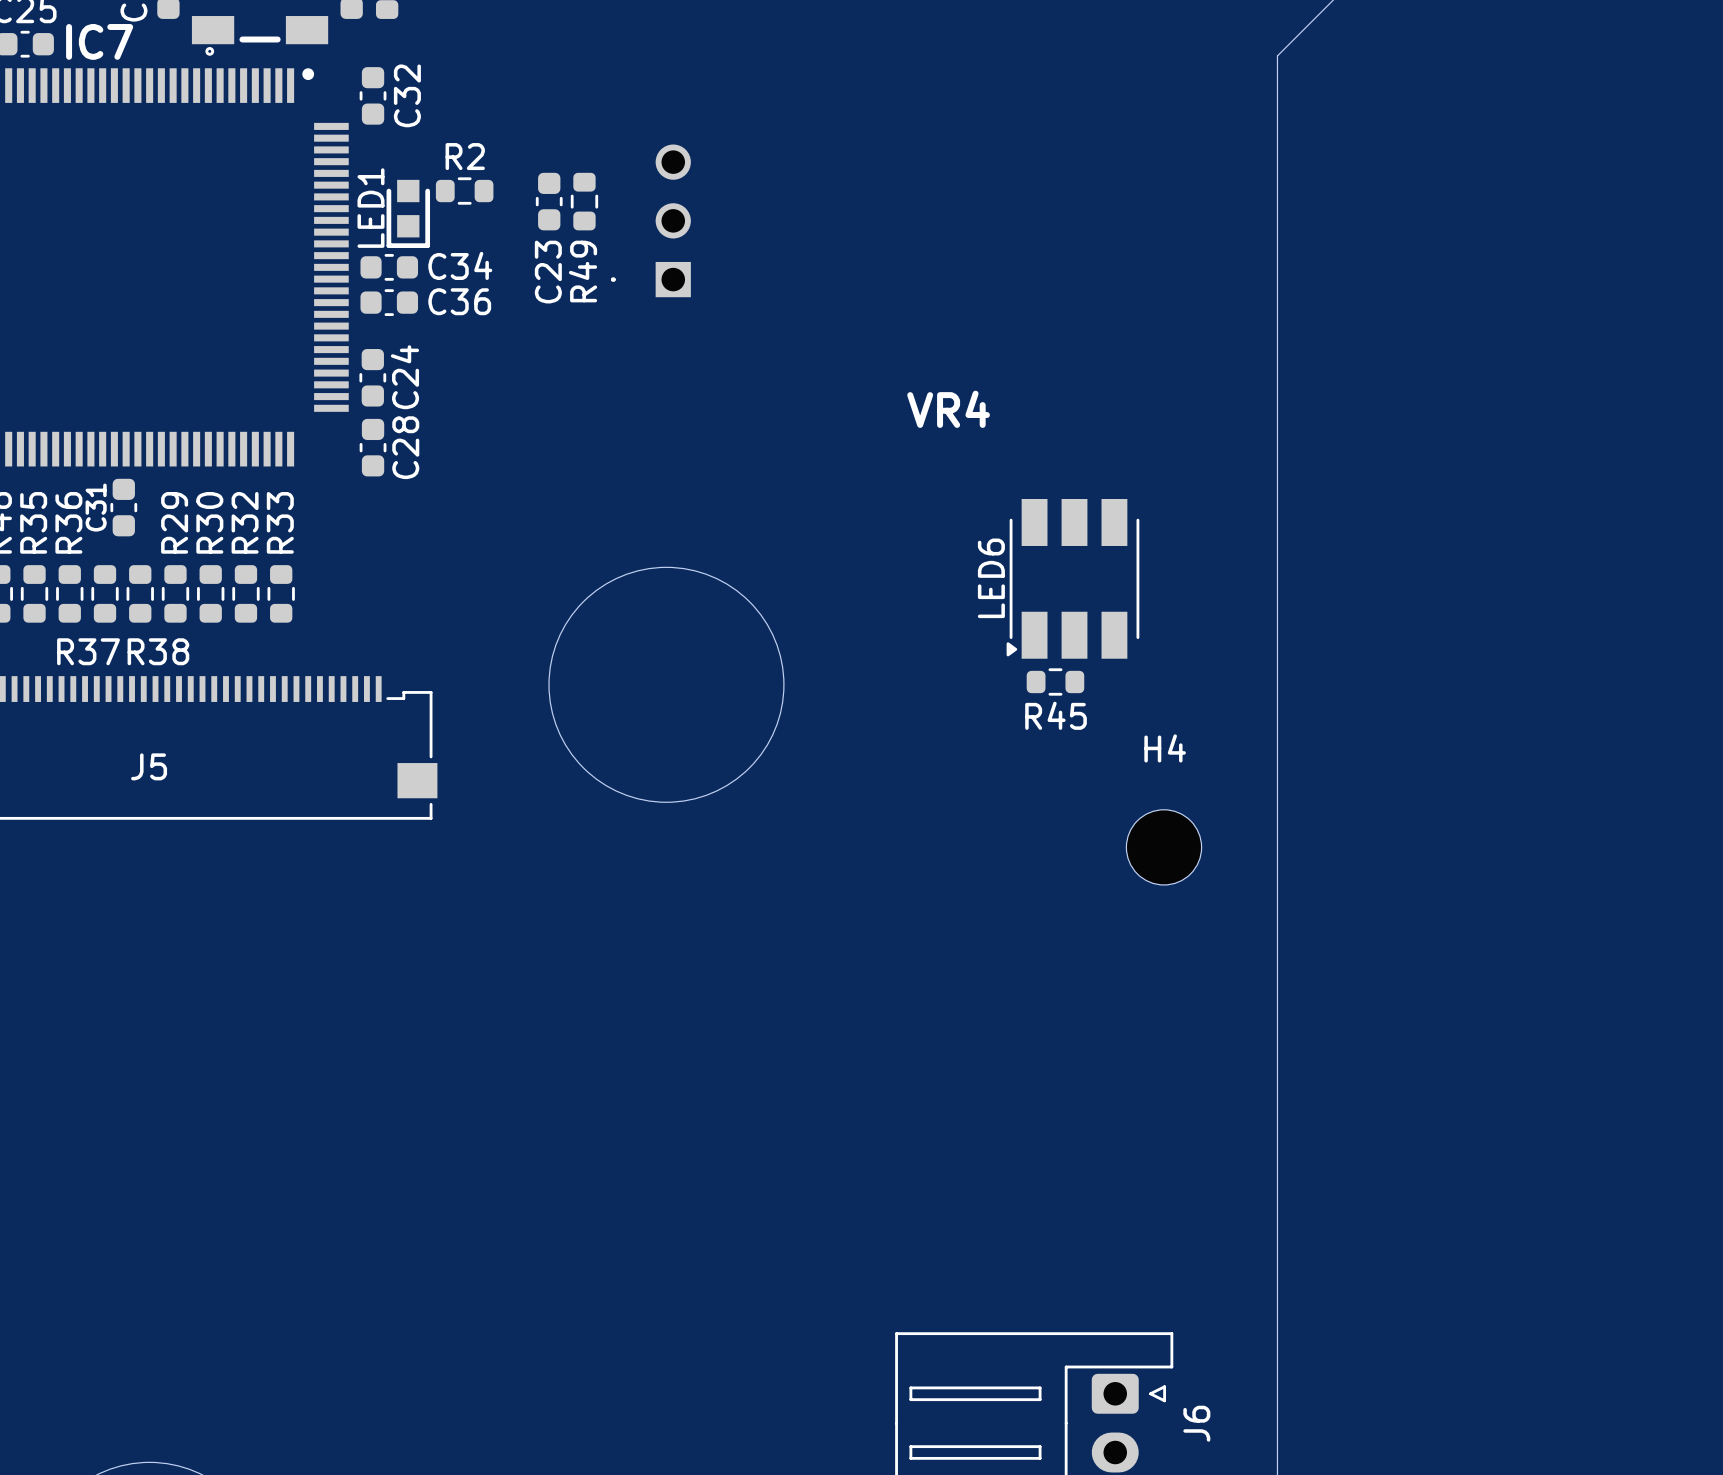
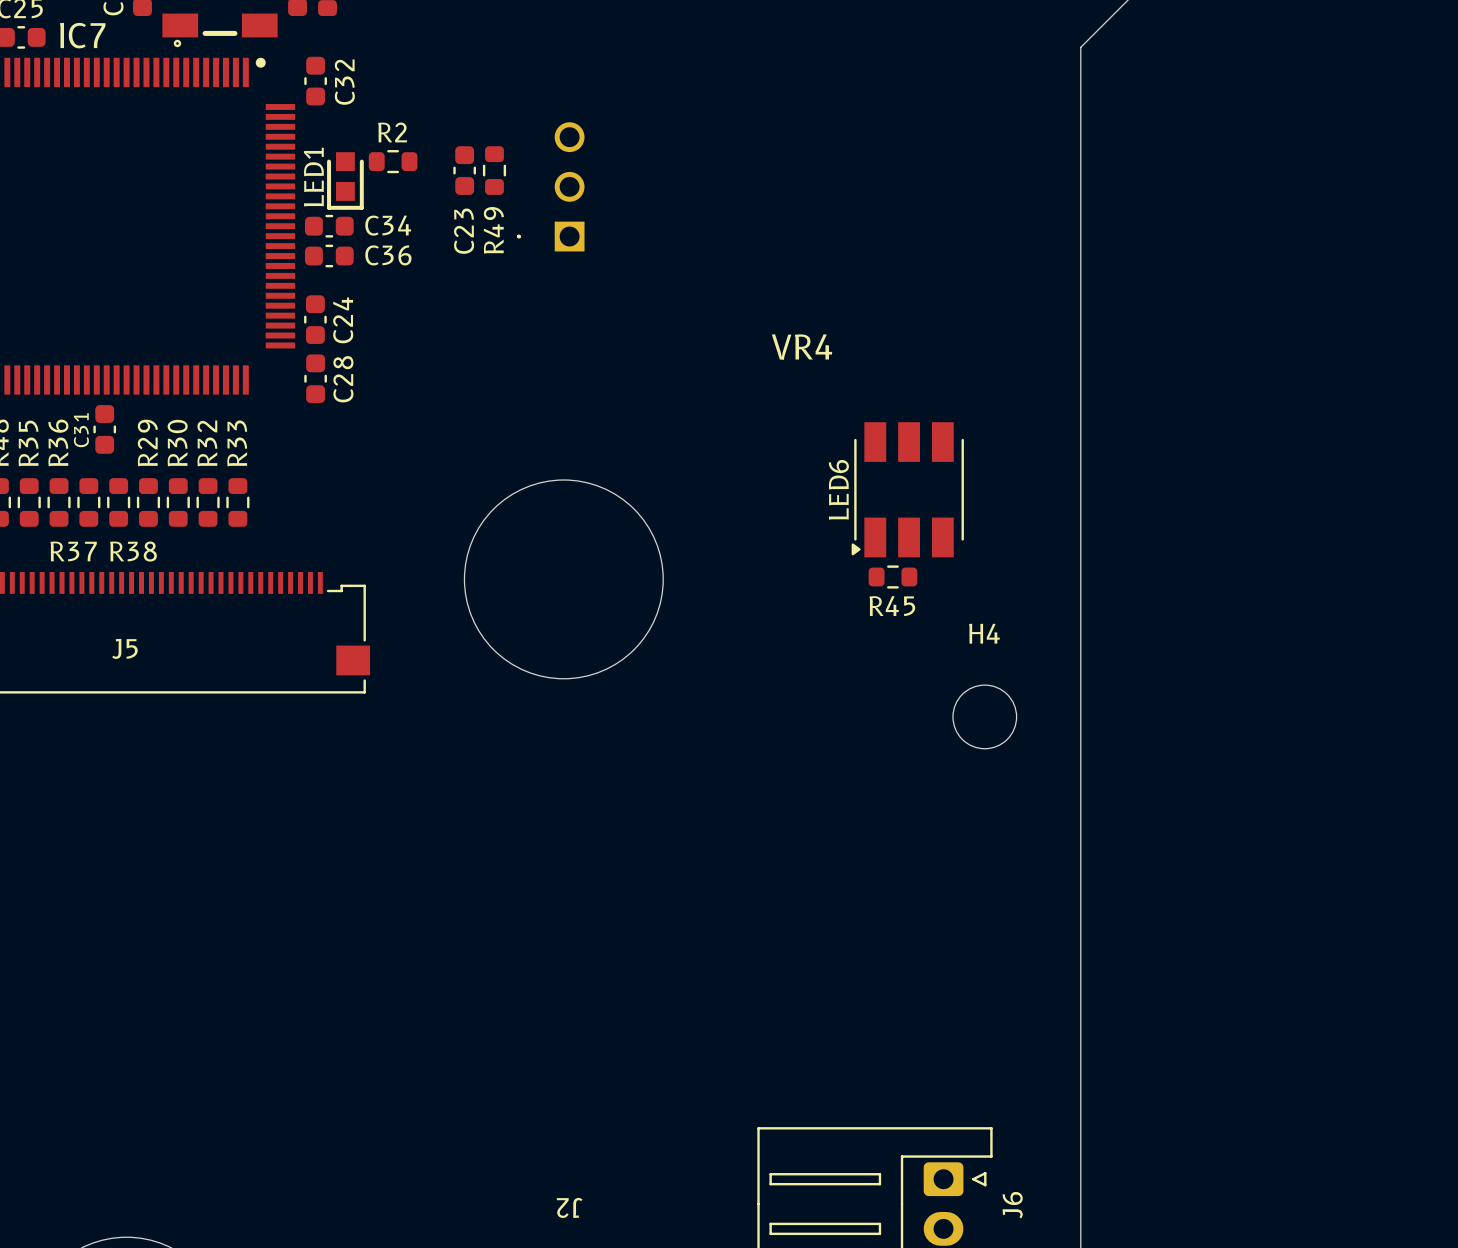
text: none -> J2 (569, 1207)

